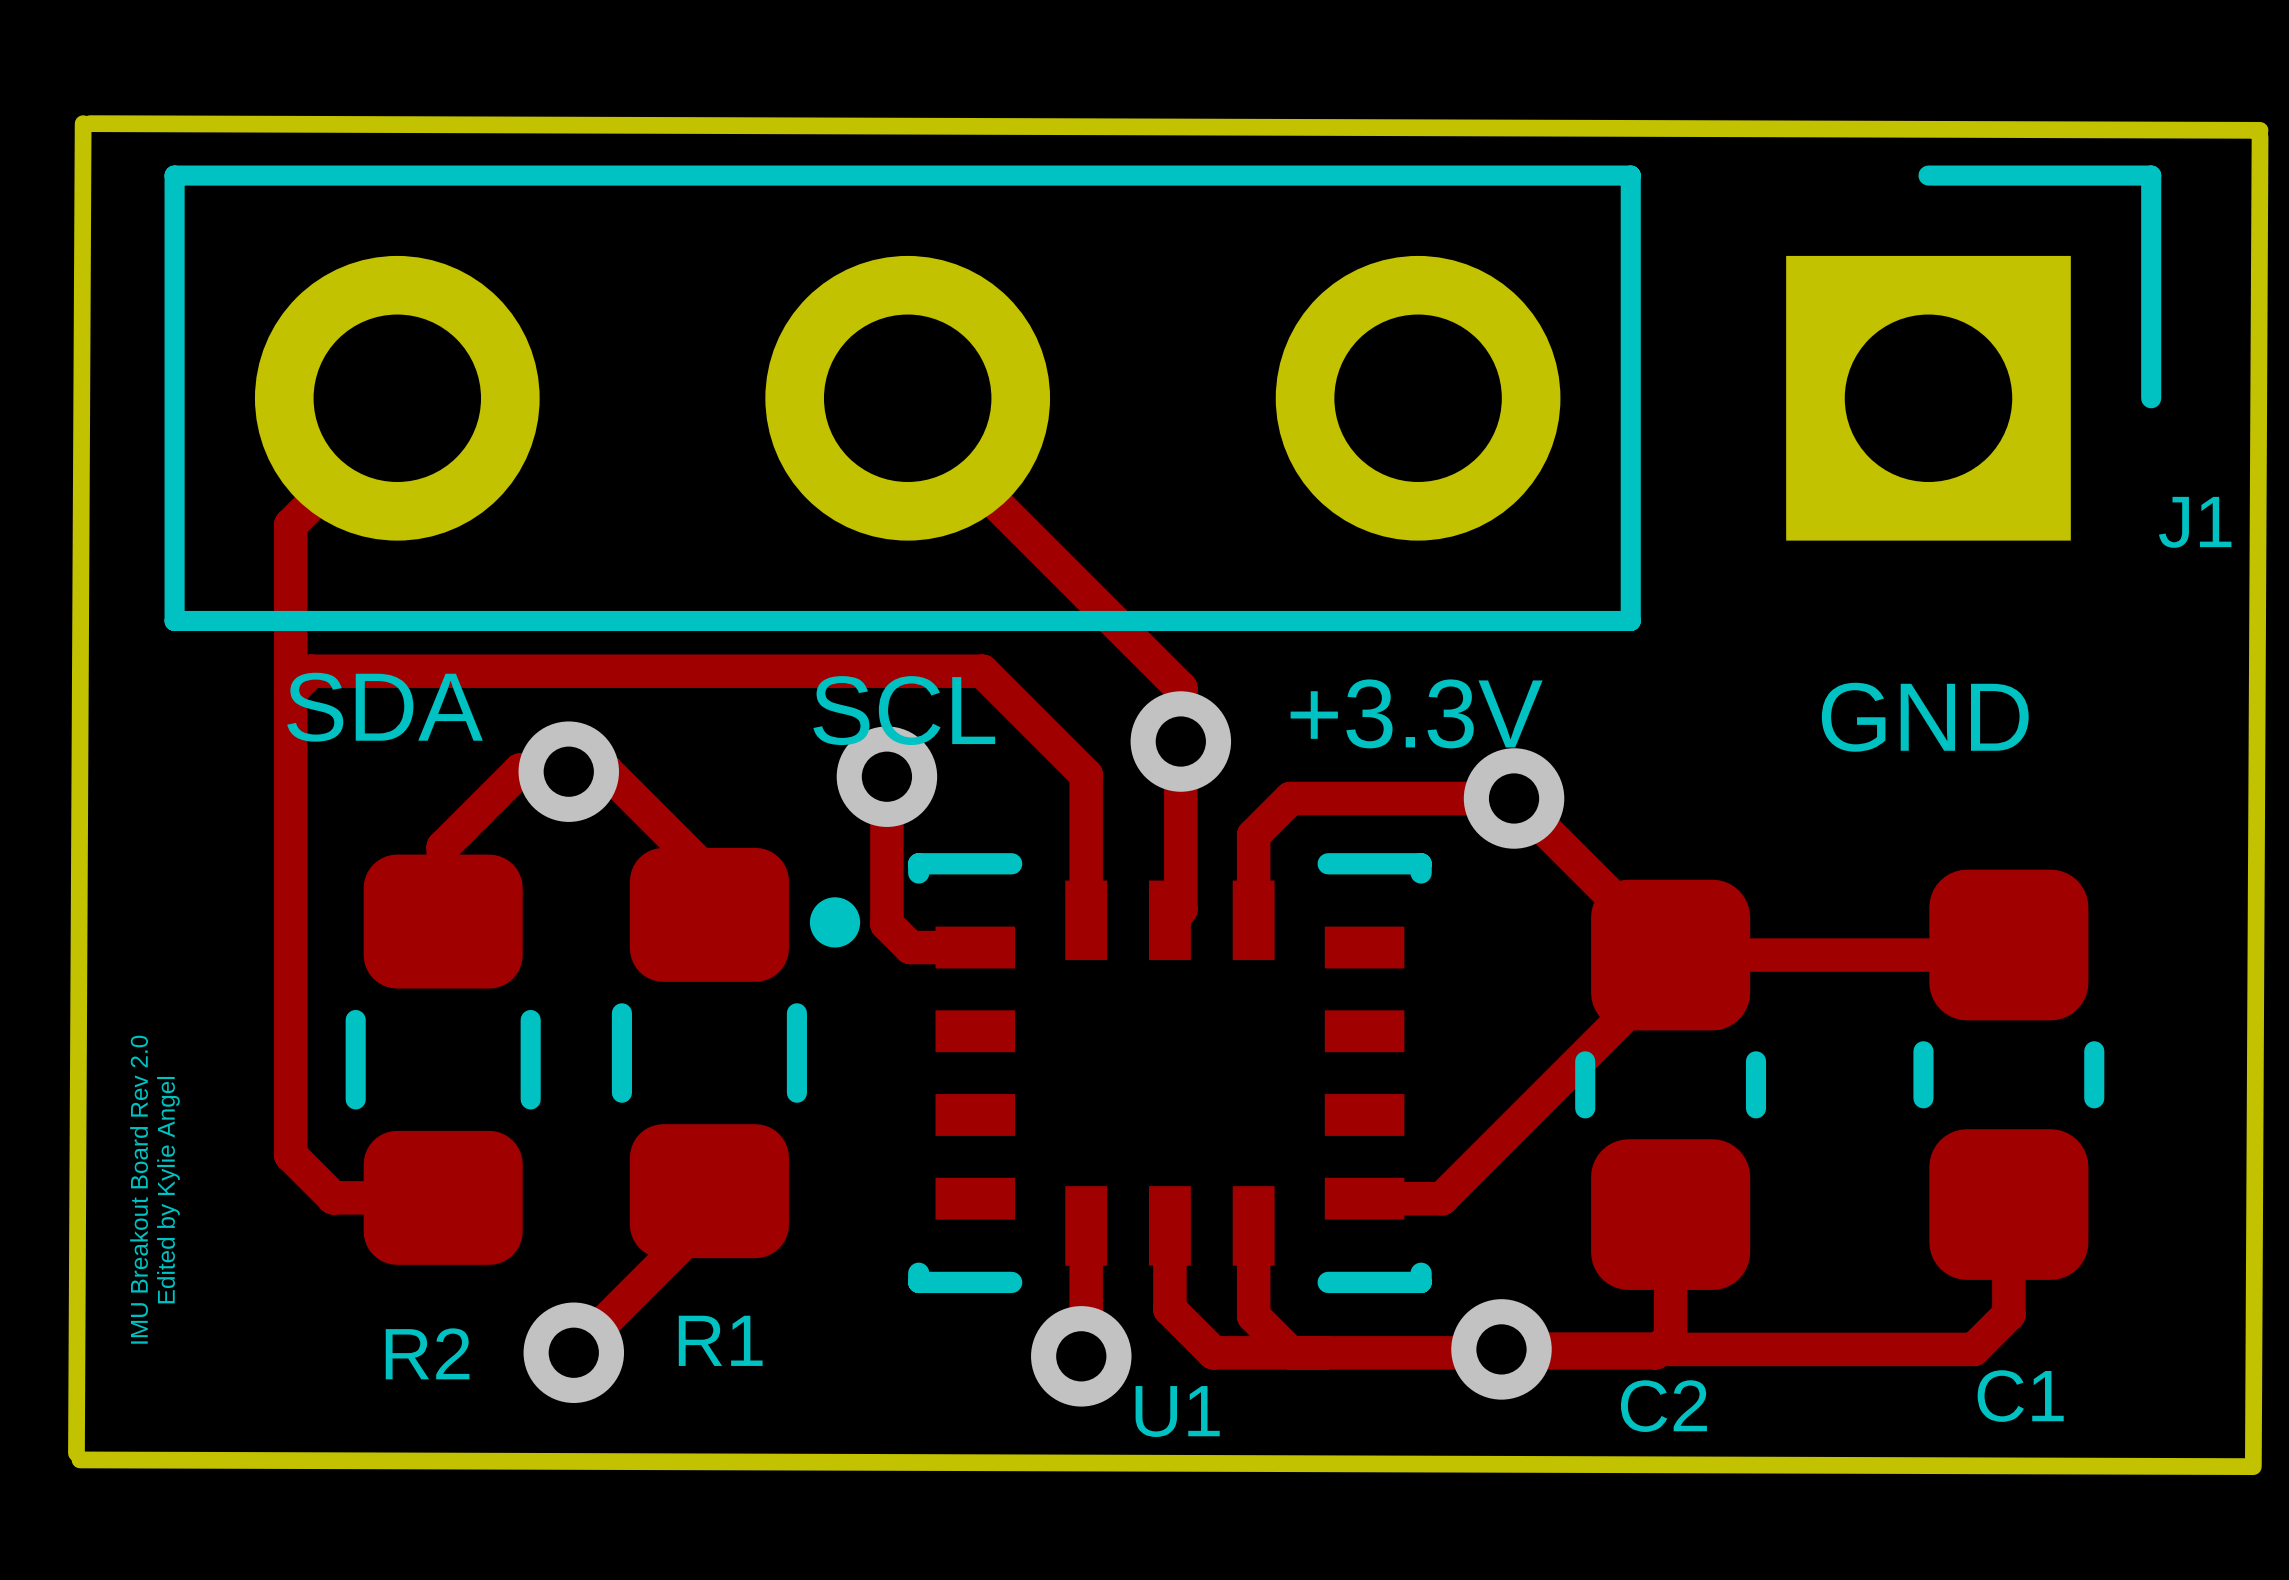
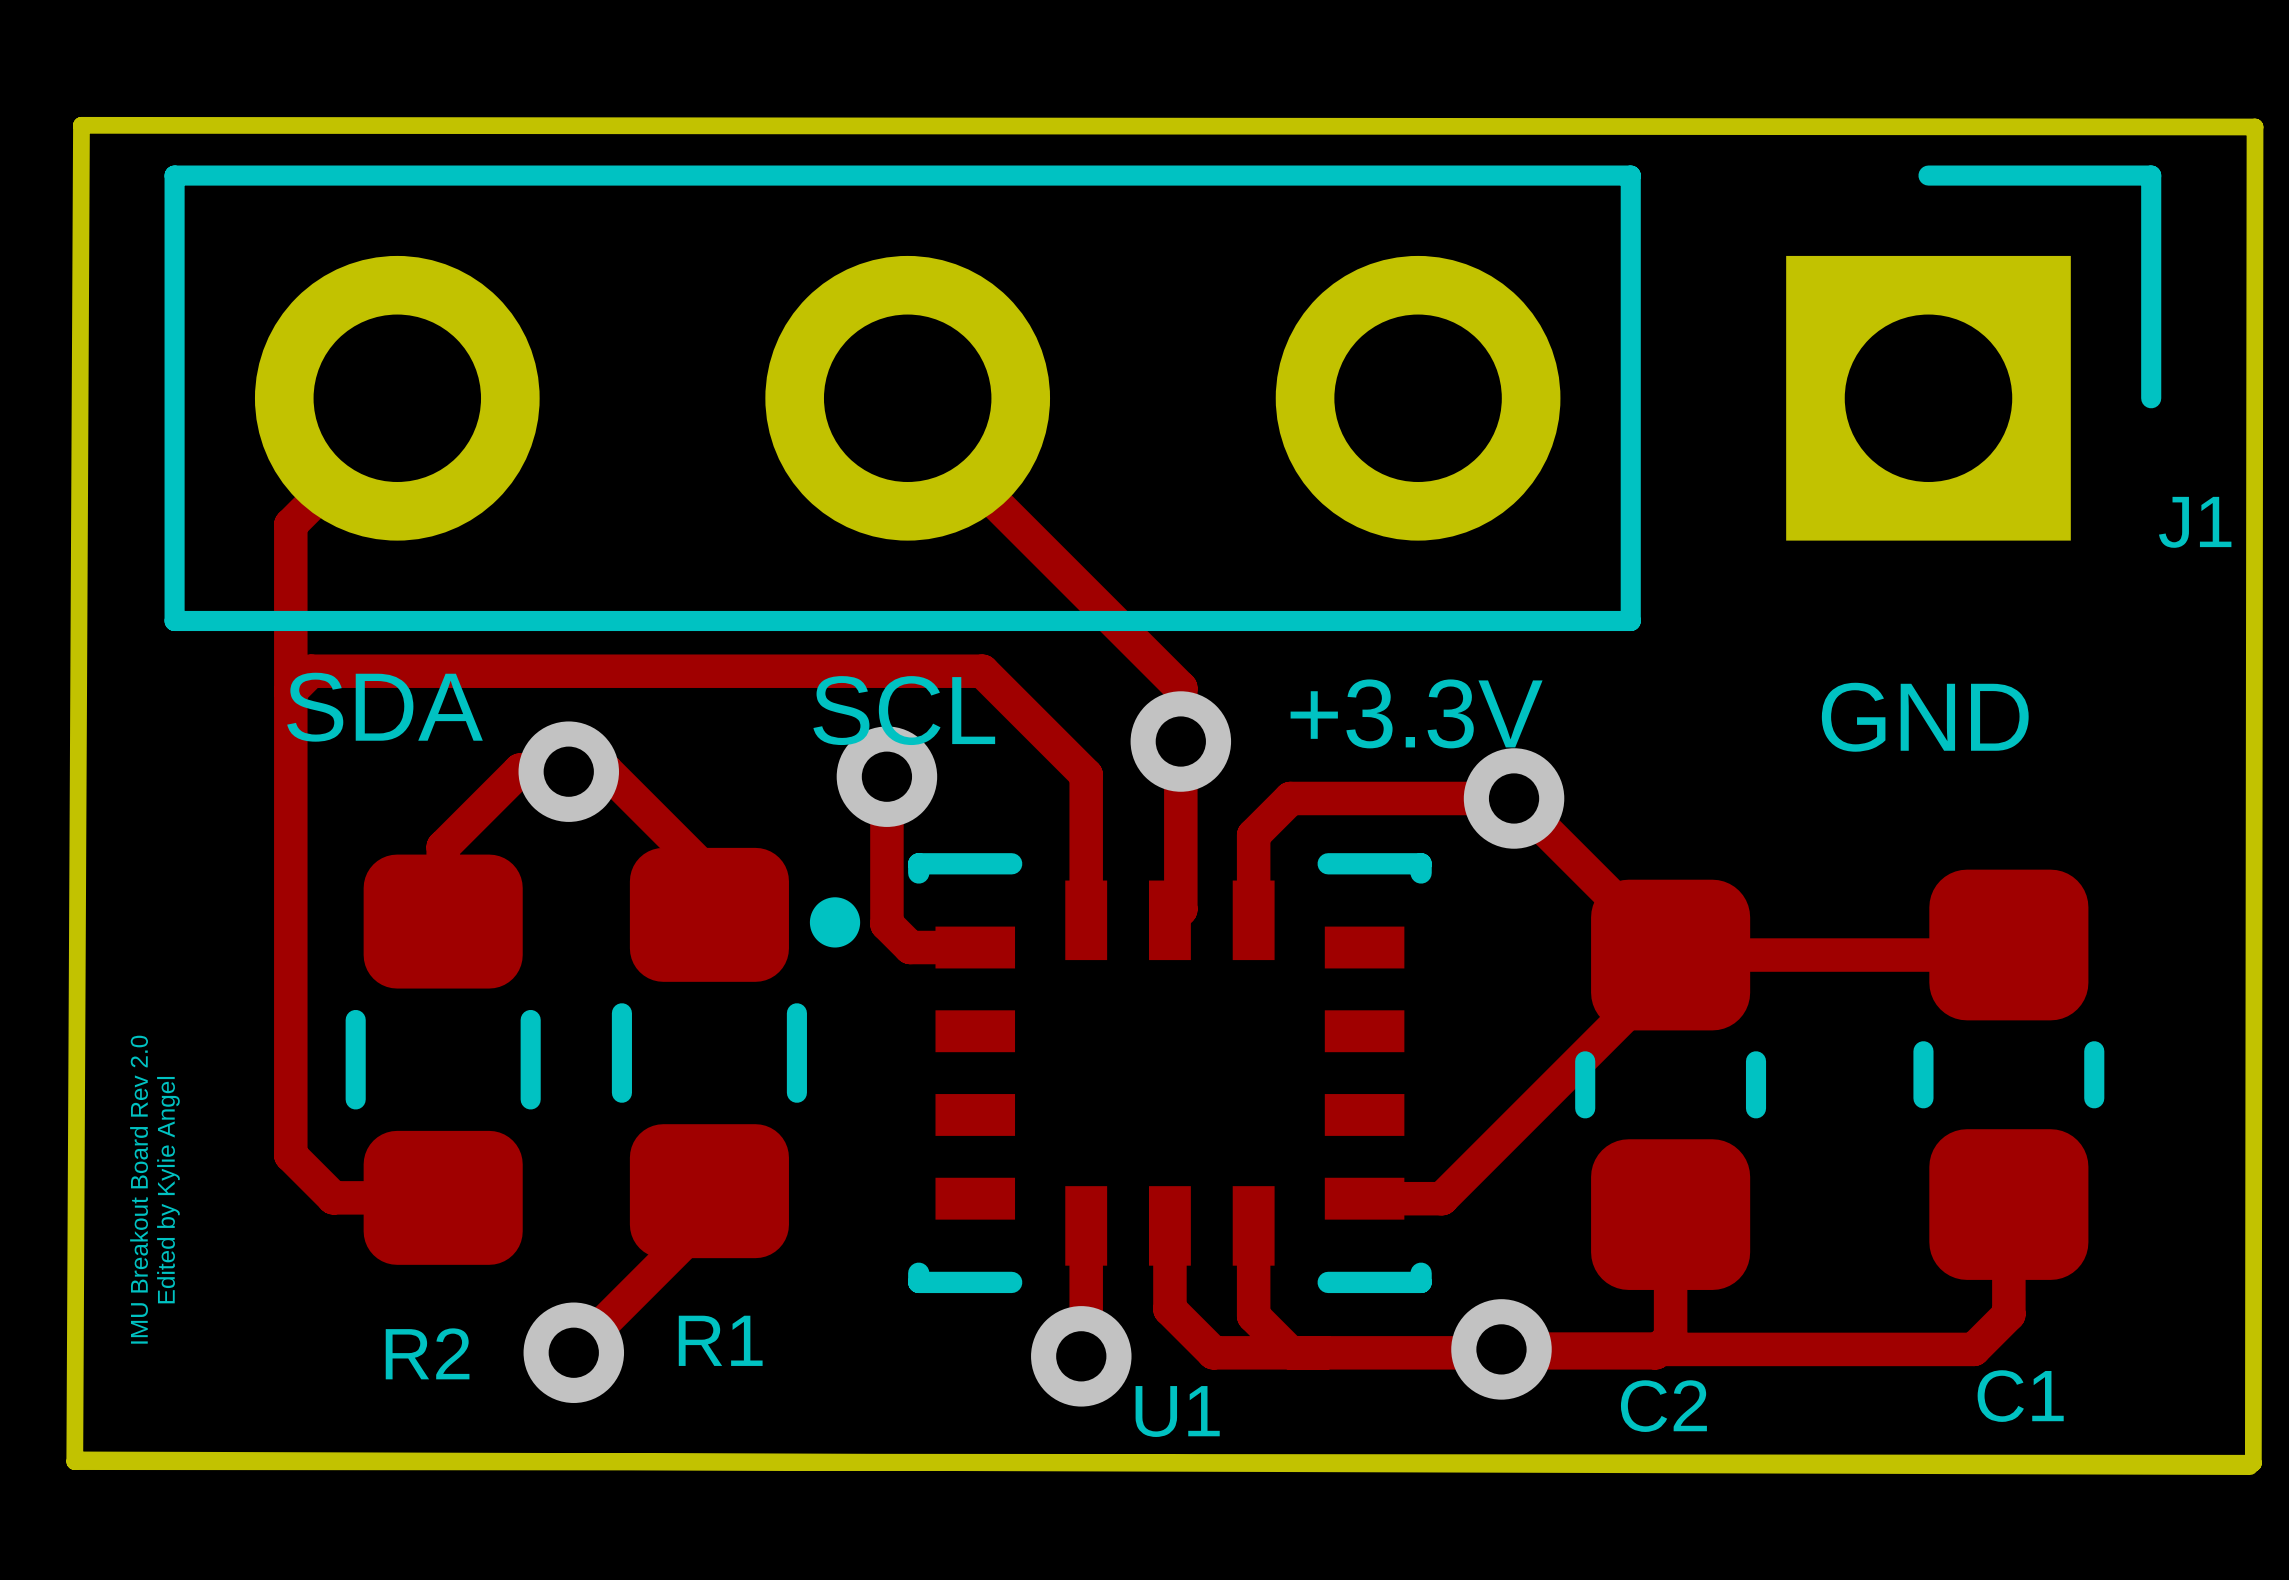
board edge: (83, 123) (76, 1453) -> (81, 125) (74, 1461) (2253, 1463) (2255, 126) (81, 125)
board edge: (90, 123) (2260, 130) -> none
board edge: (2260, 137) (2253, 1466) -> none

